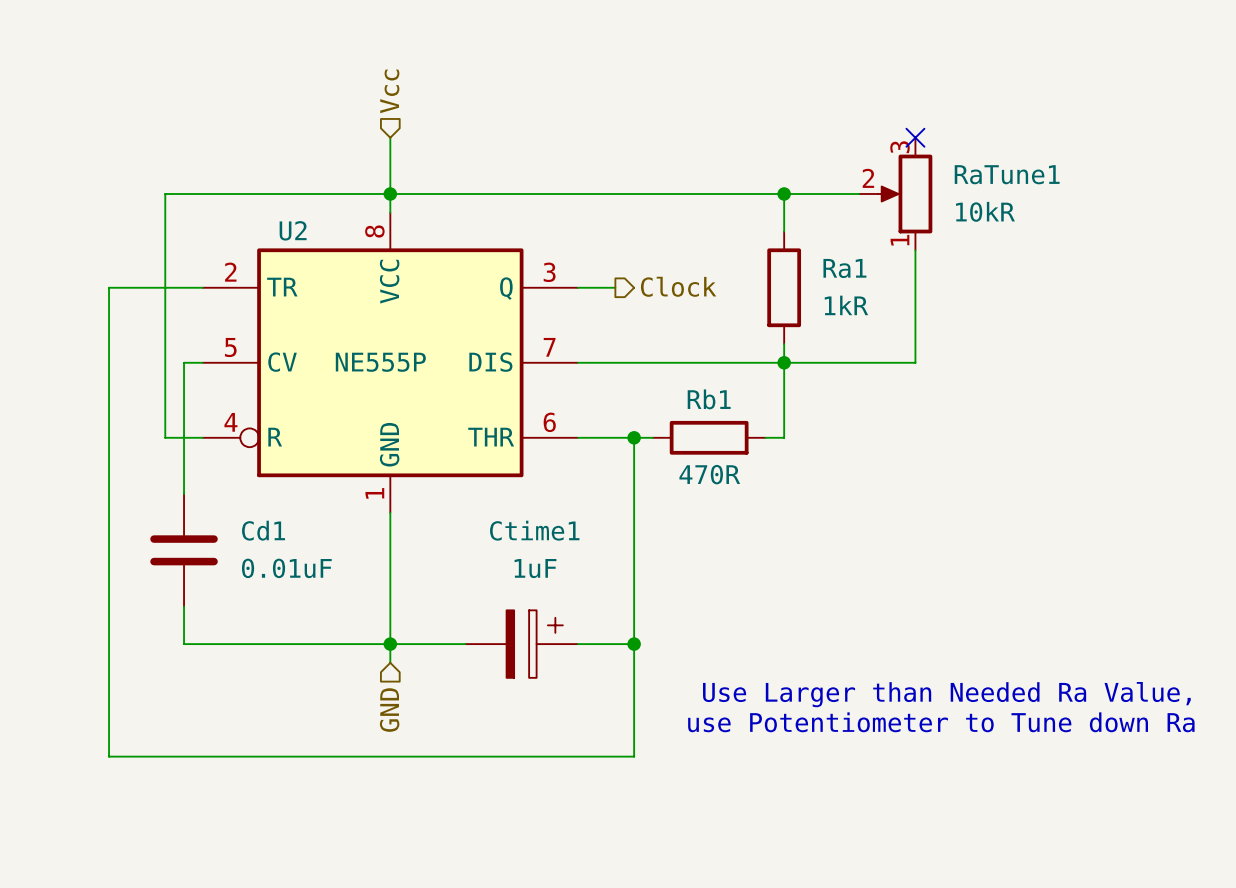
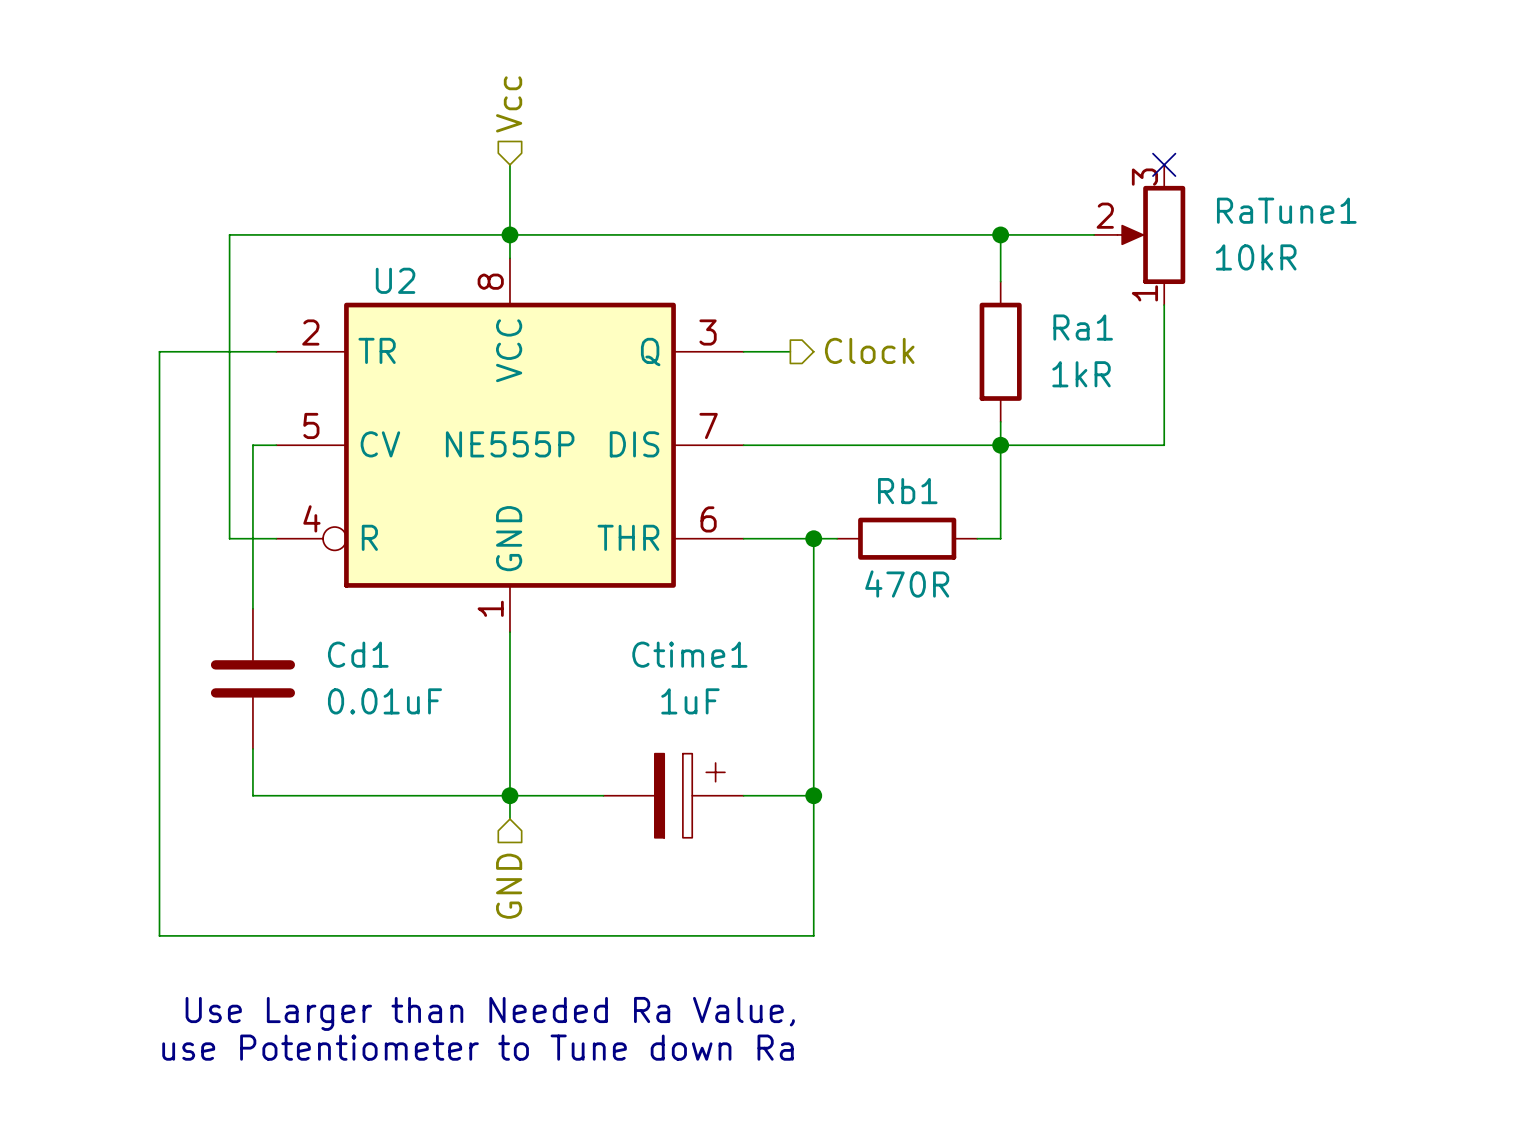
text: Use Larger than Needed Ra Value, (946, 694) -> none
text: use Potentiometer to Tune down Ra (941, 722) -> none
text: none -> Use Larger than Needed Ra Value, (490, 1013)
text: none -> use Potentiometer to Tune down Ra (477, 1047)

